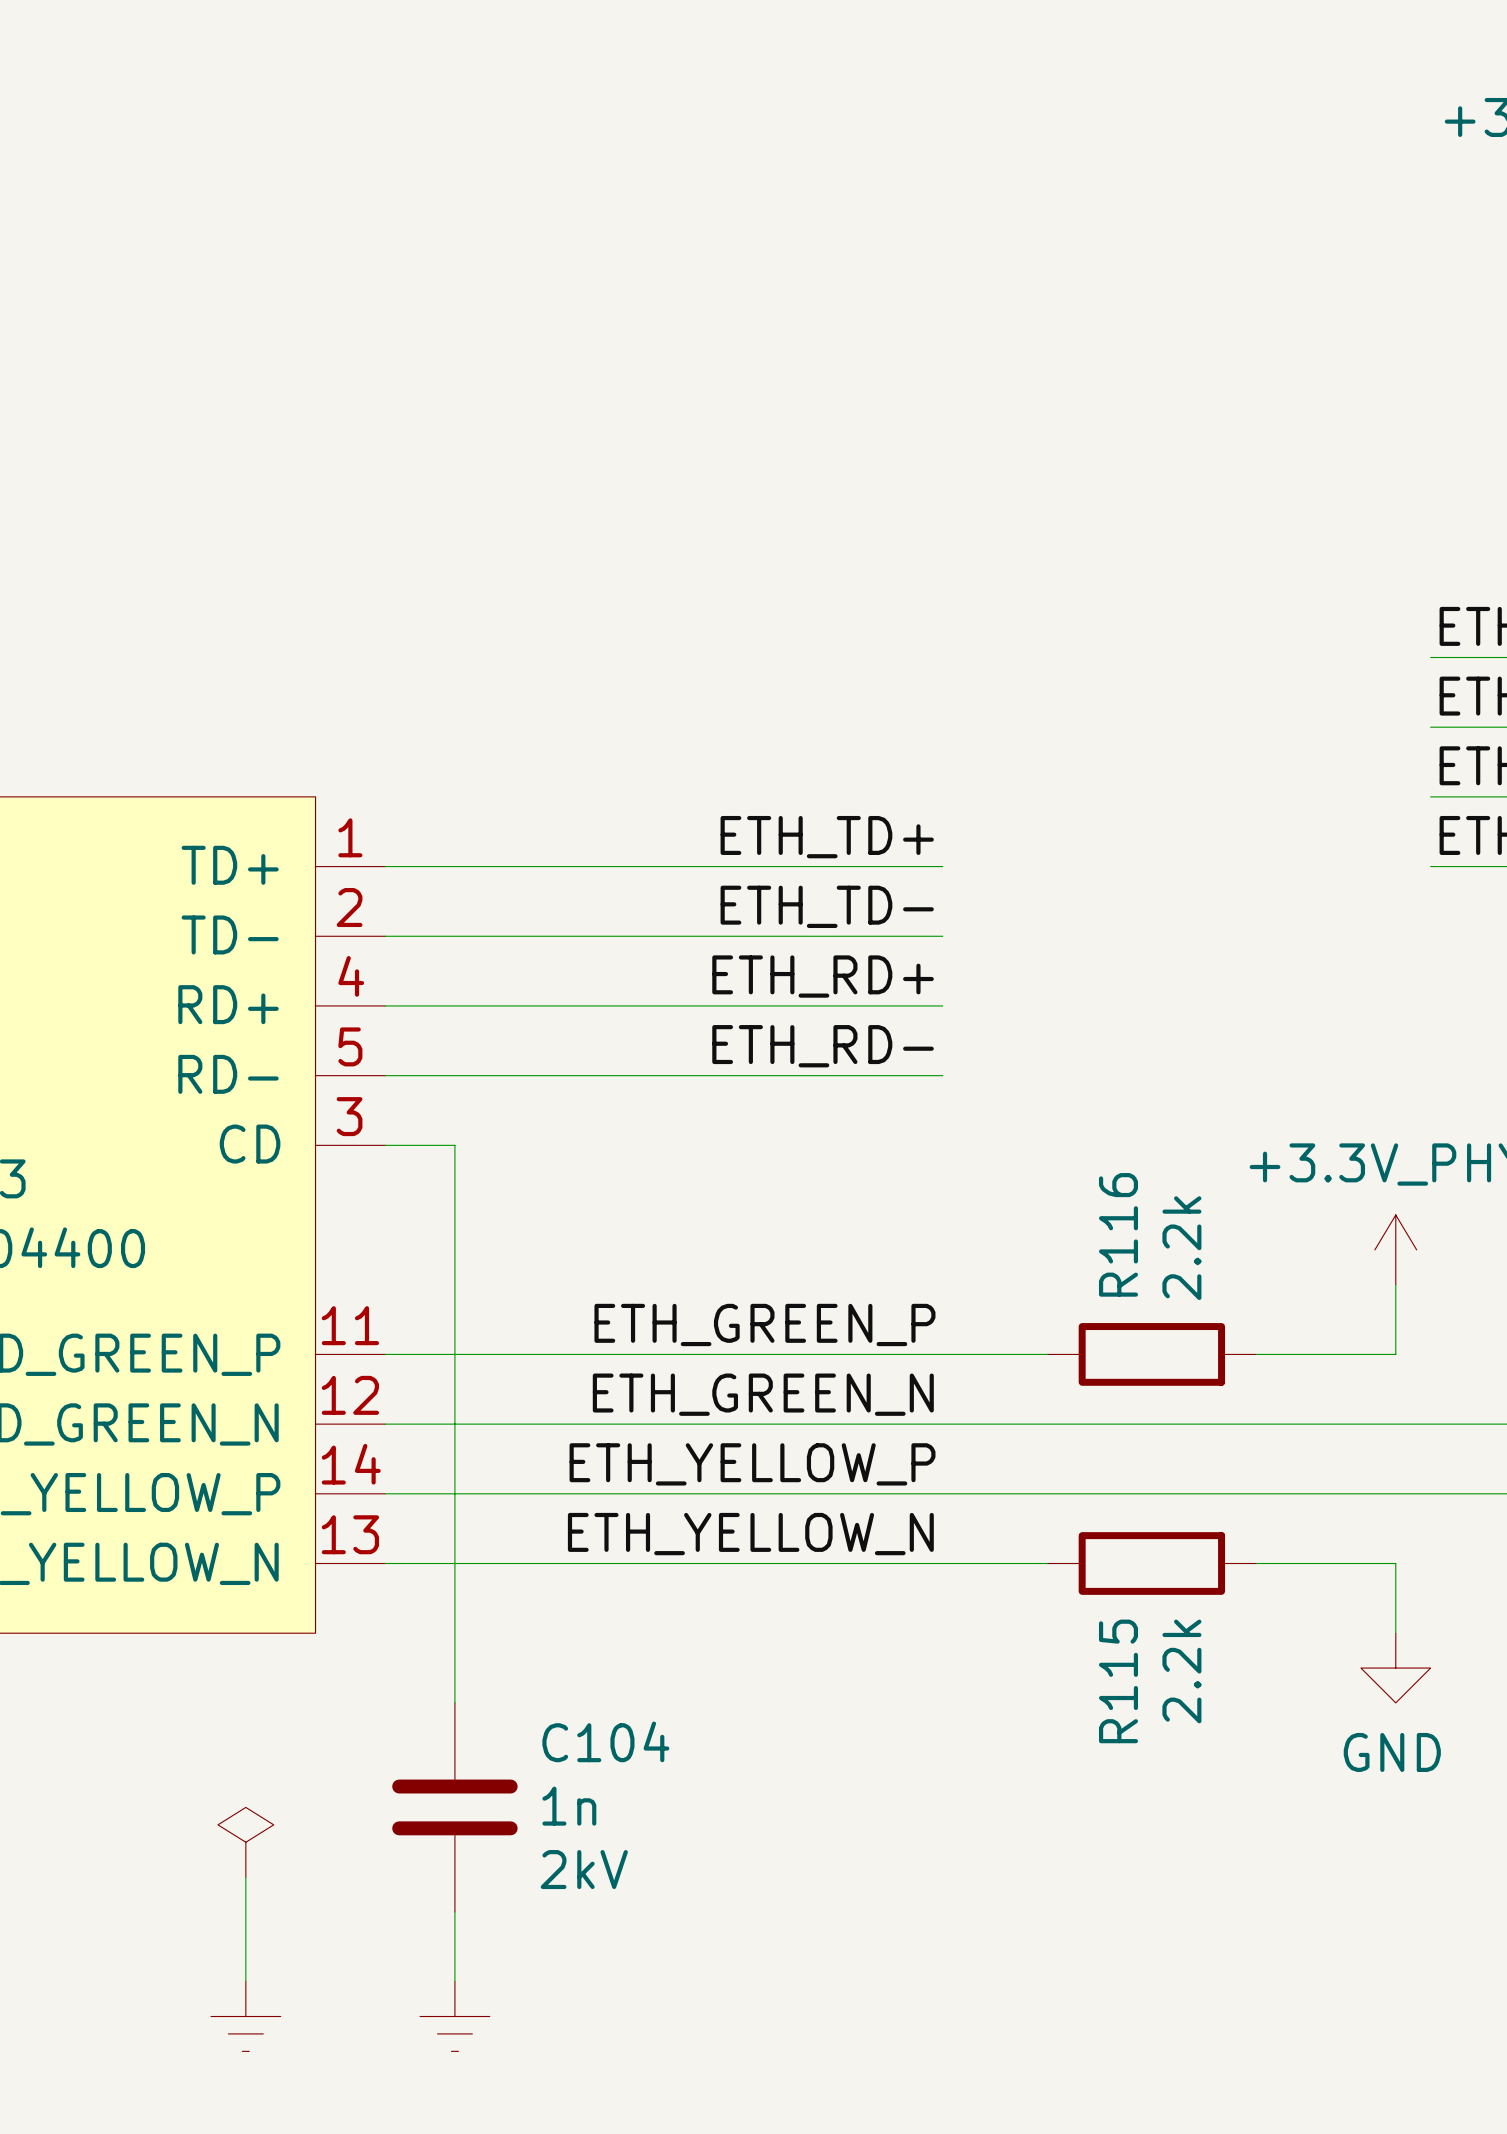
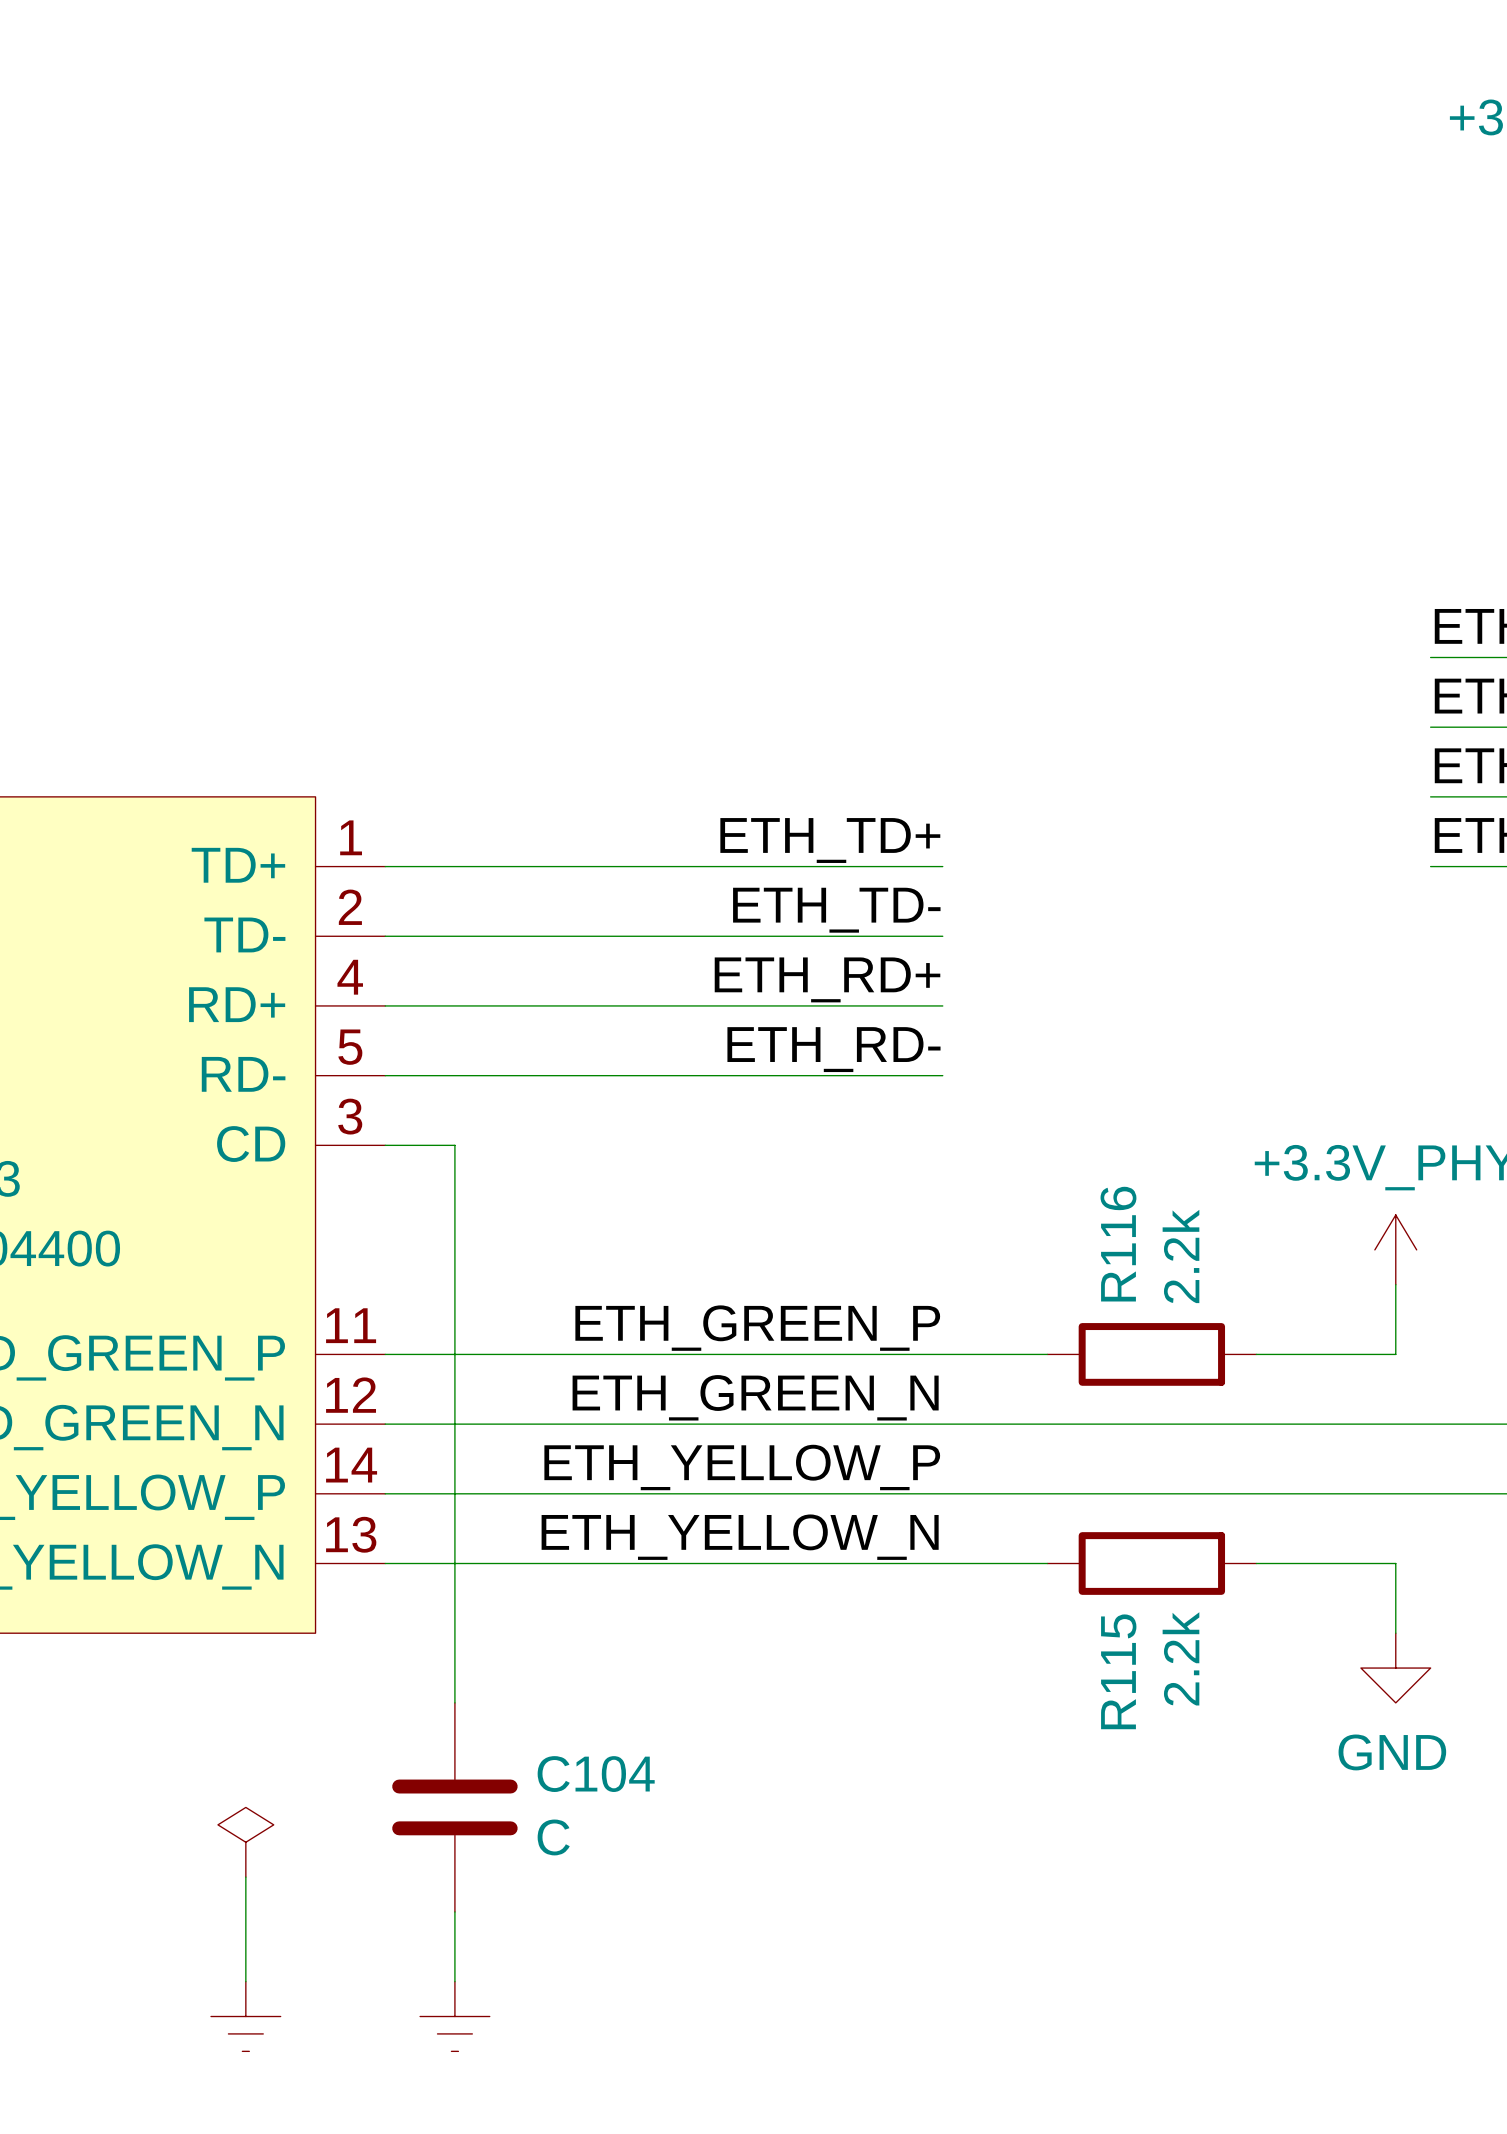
C104 name position: C104 (605, 1741) -> C104 (596, 1774)
C104 value: 1n (569, 1806) -> C (553, 1837)
C104 text: 2kV (584, 1869) -> none

